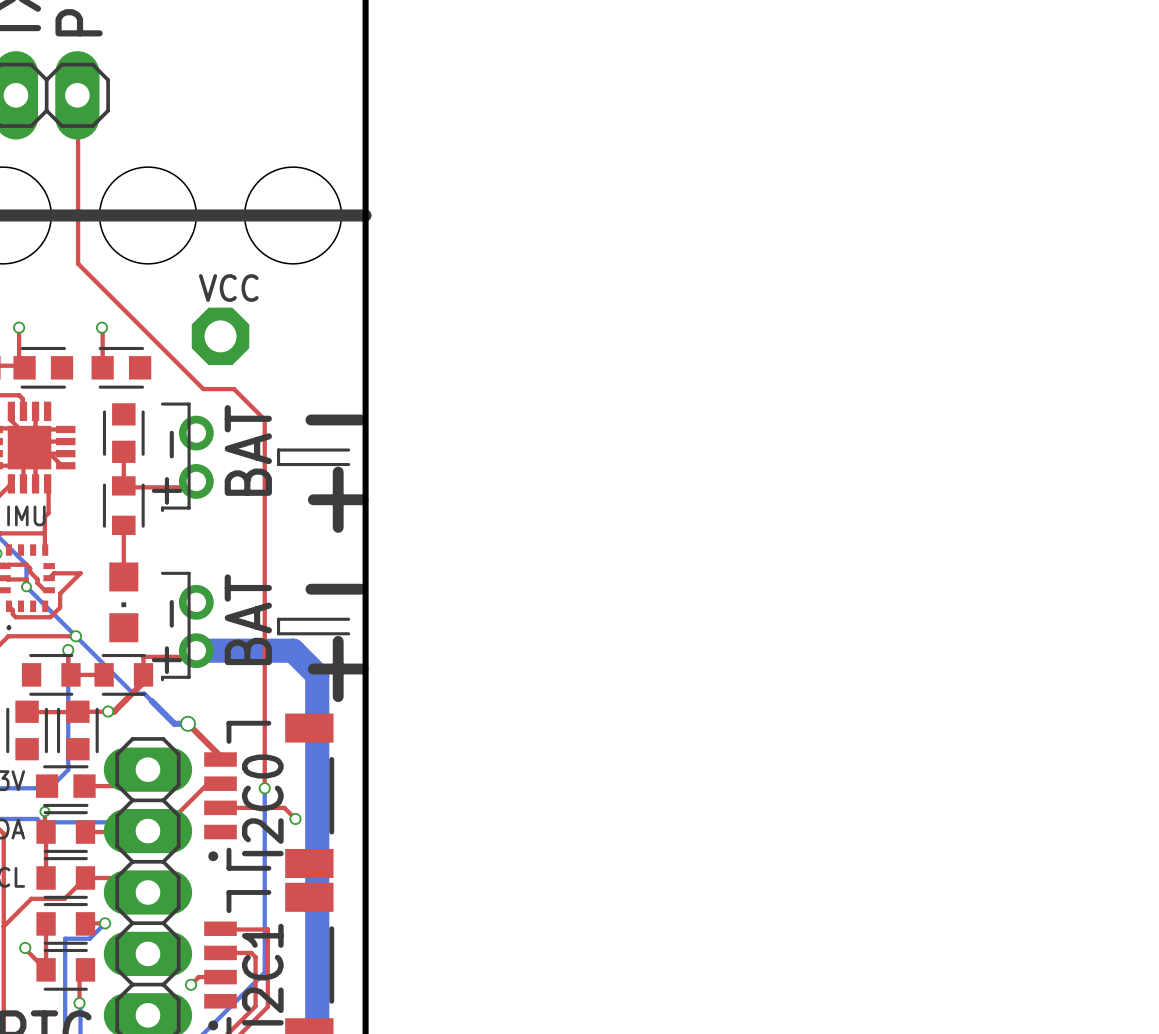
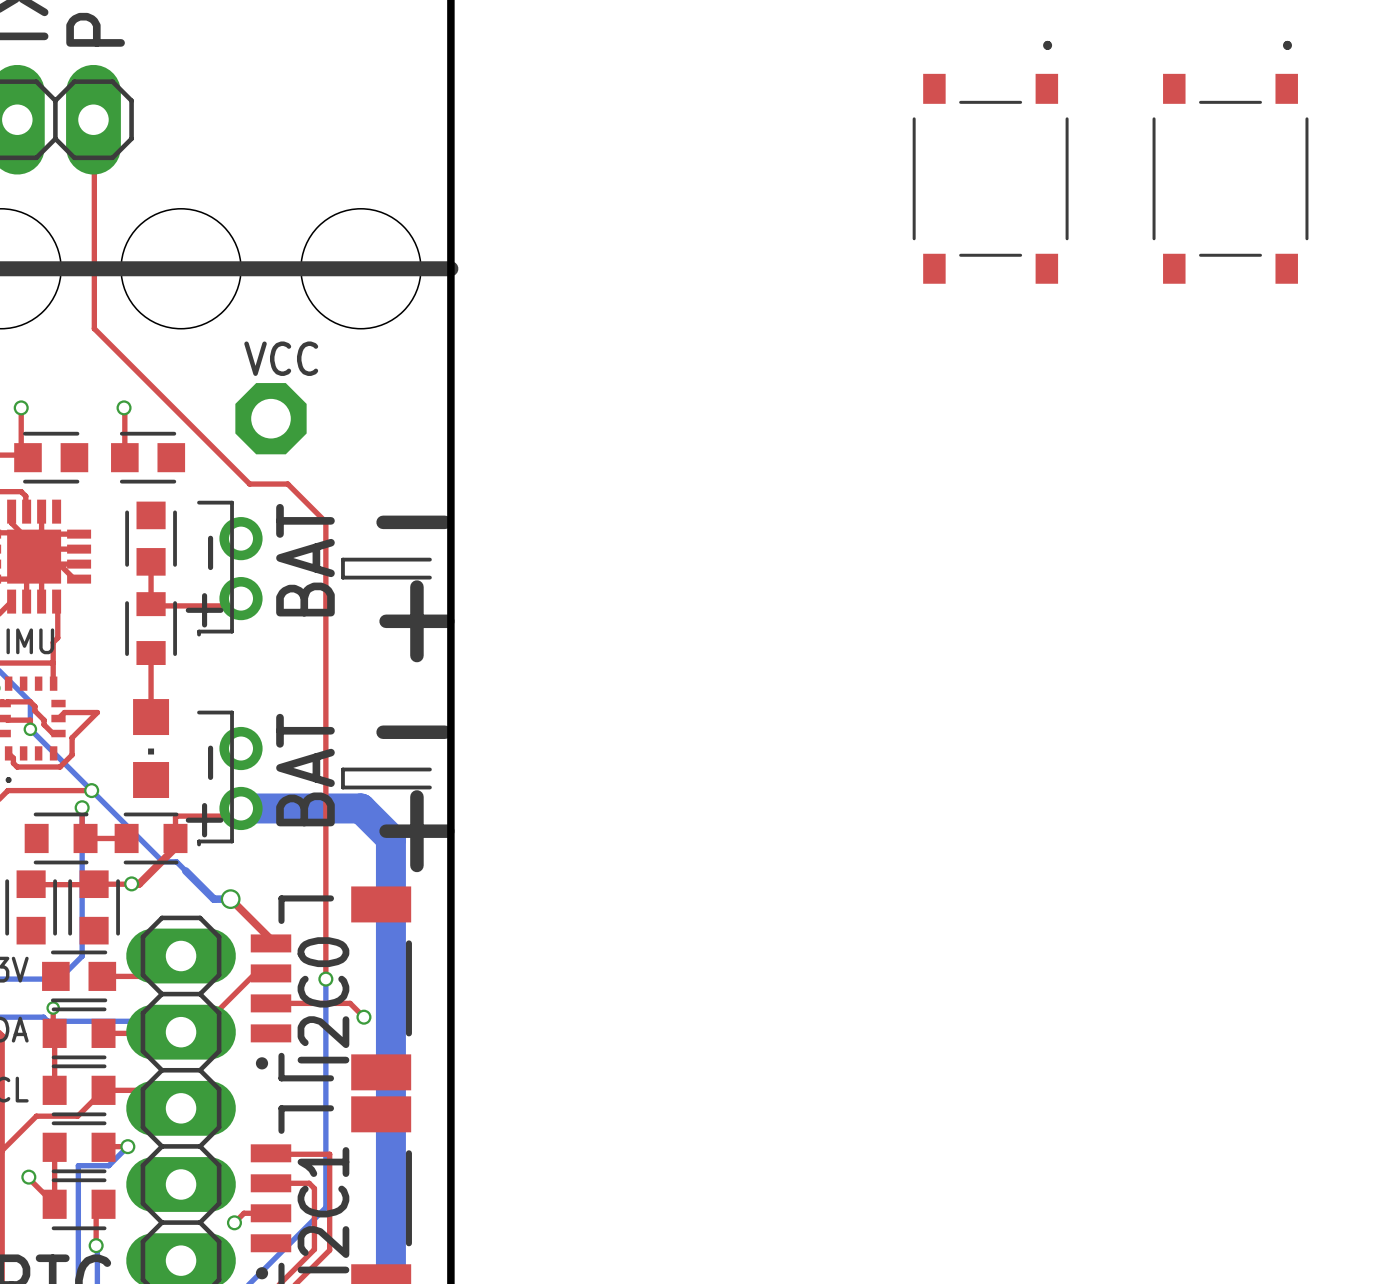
part: none -> (990, 162)
part: none -> (1230, 162)

